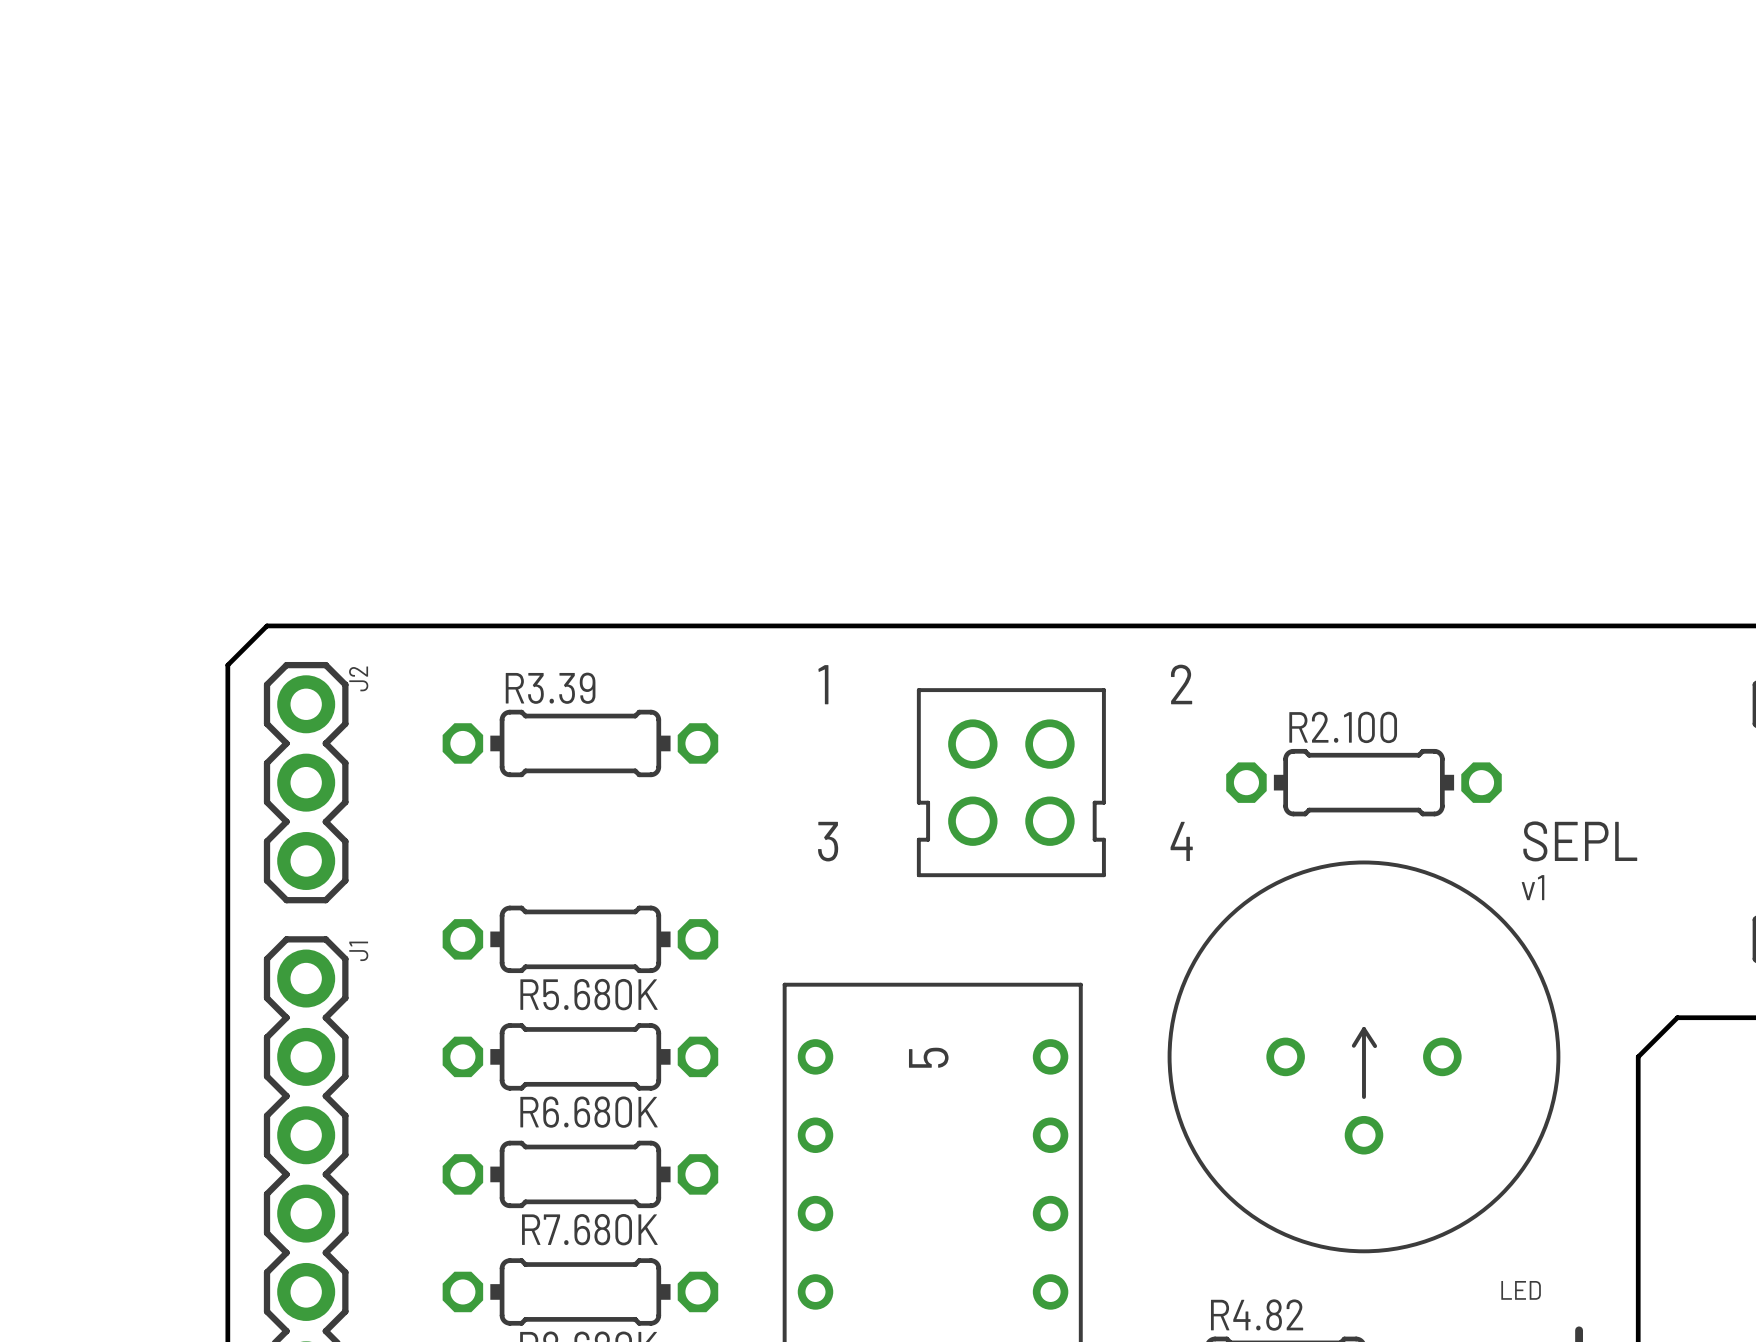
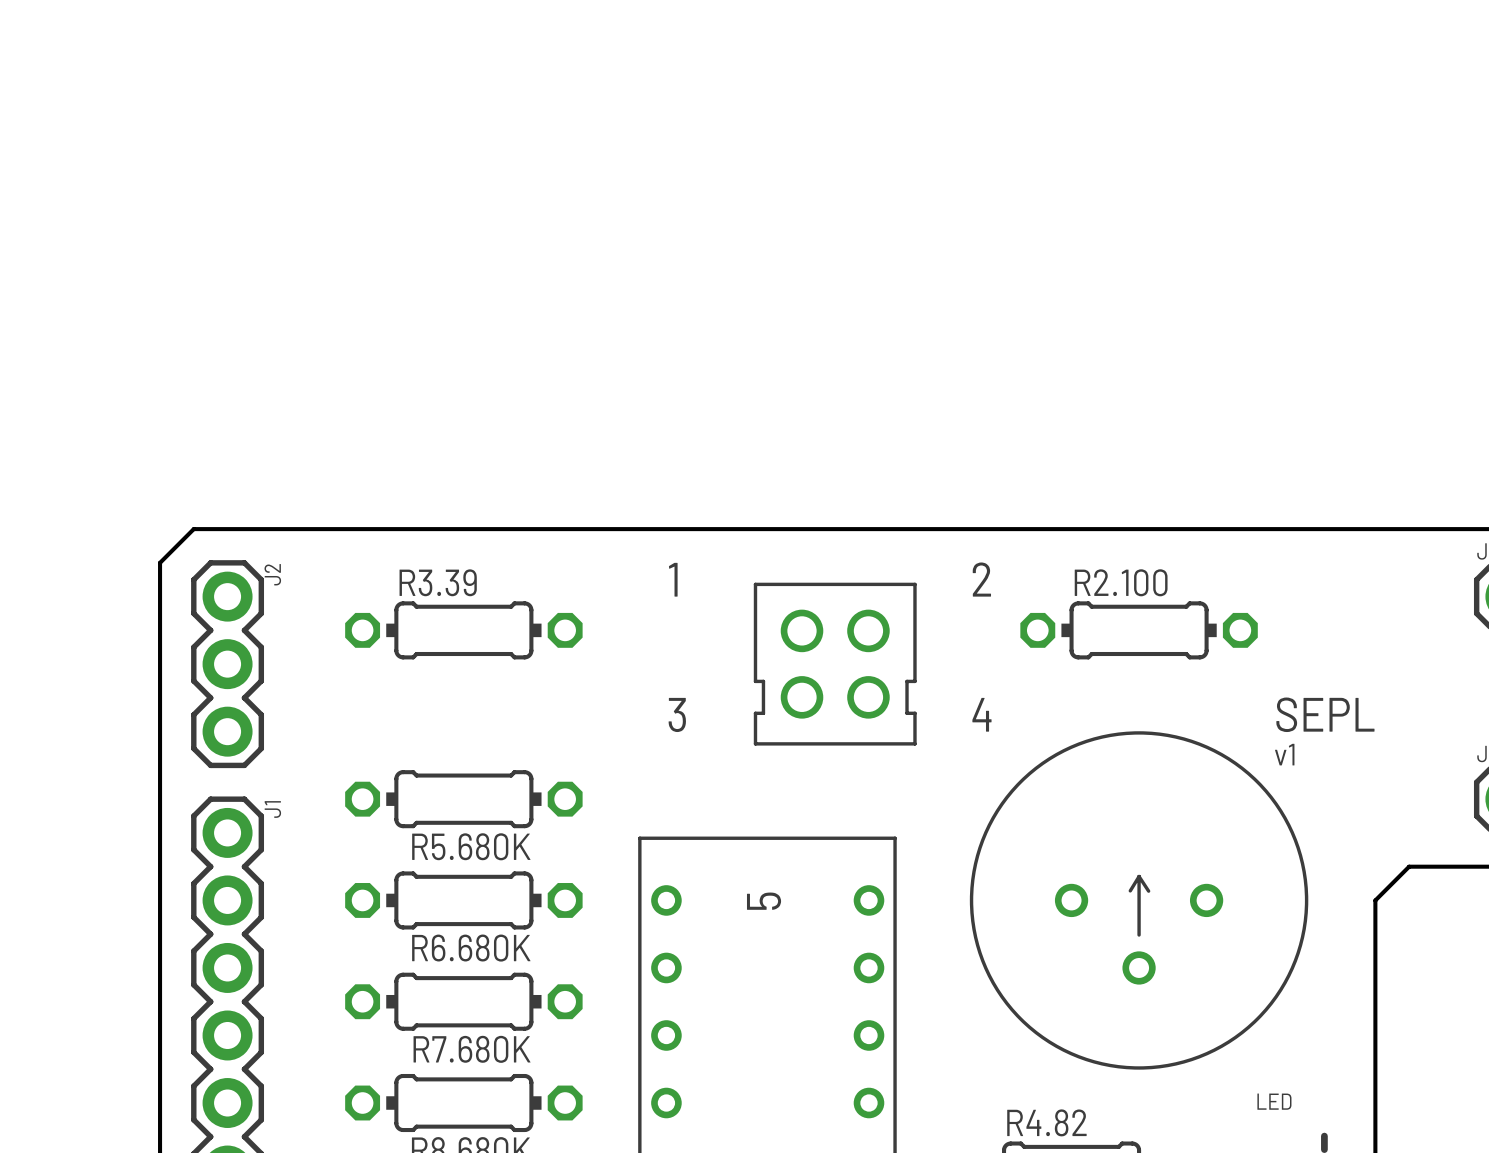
R2.100 position: (1363, 782) -> (1139, 630)

